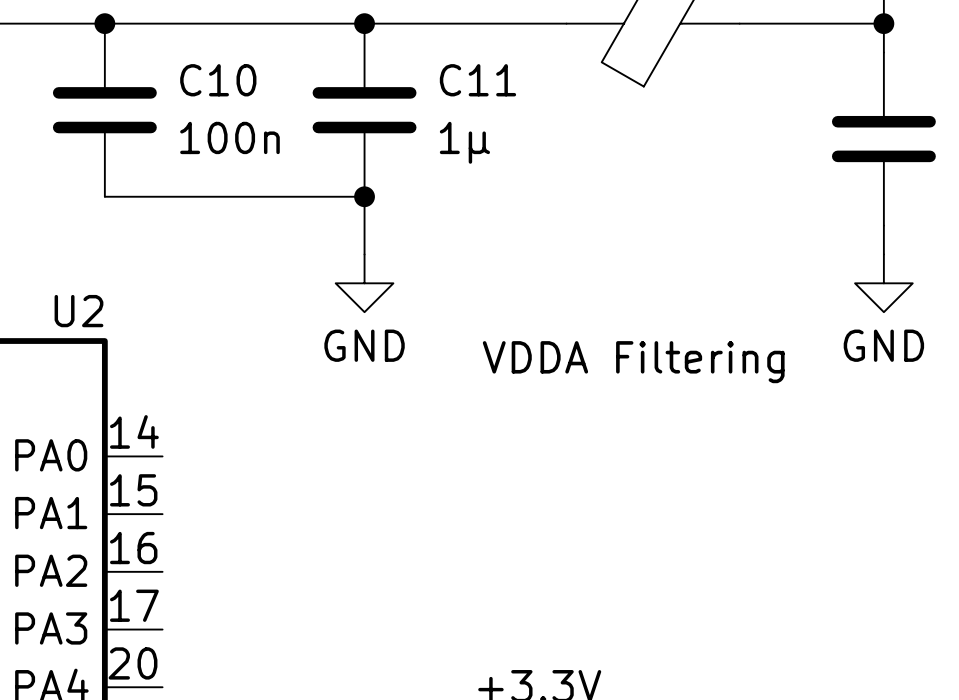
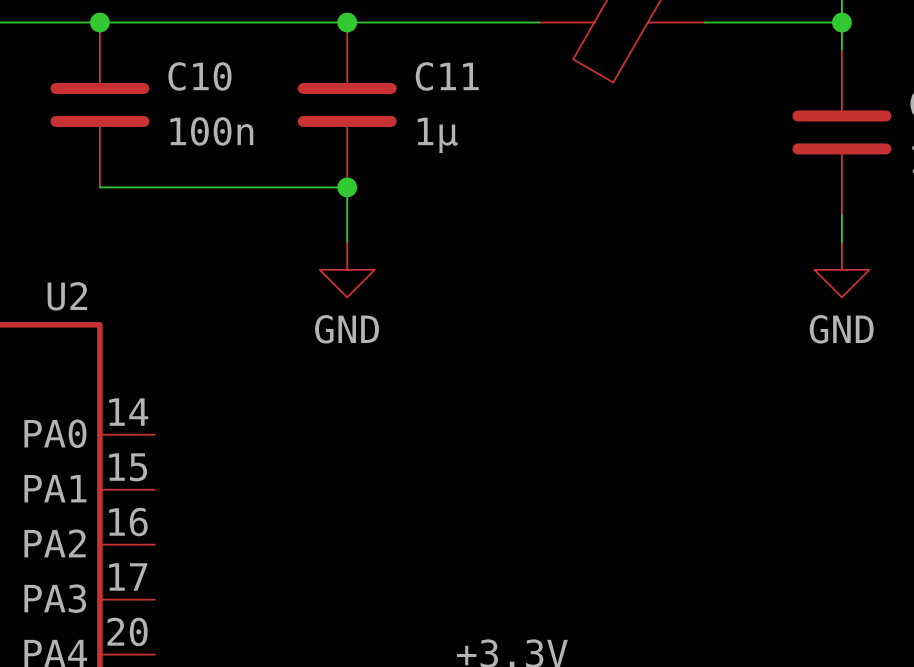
text: VDDA Filtering (633, 362) -> none

